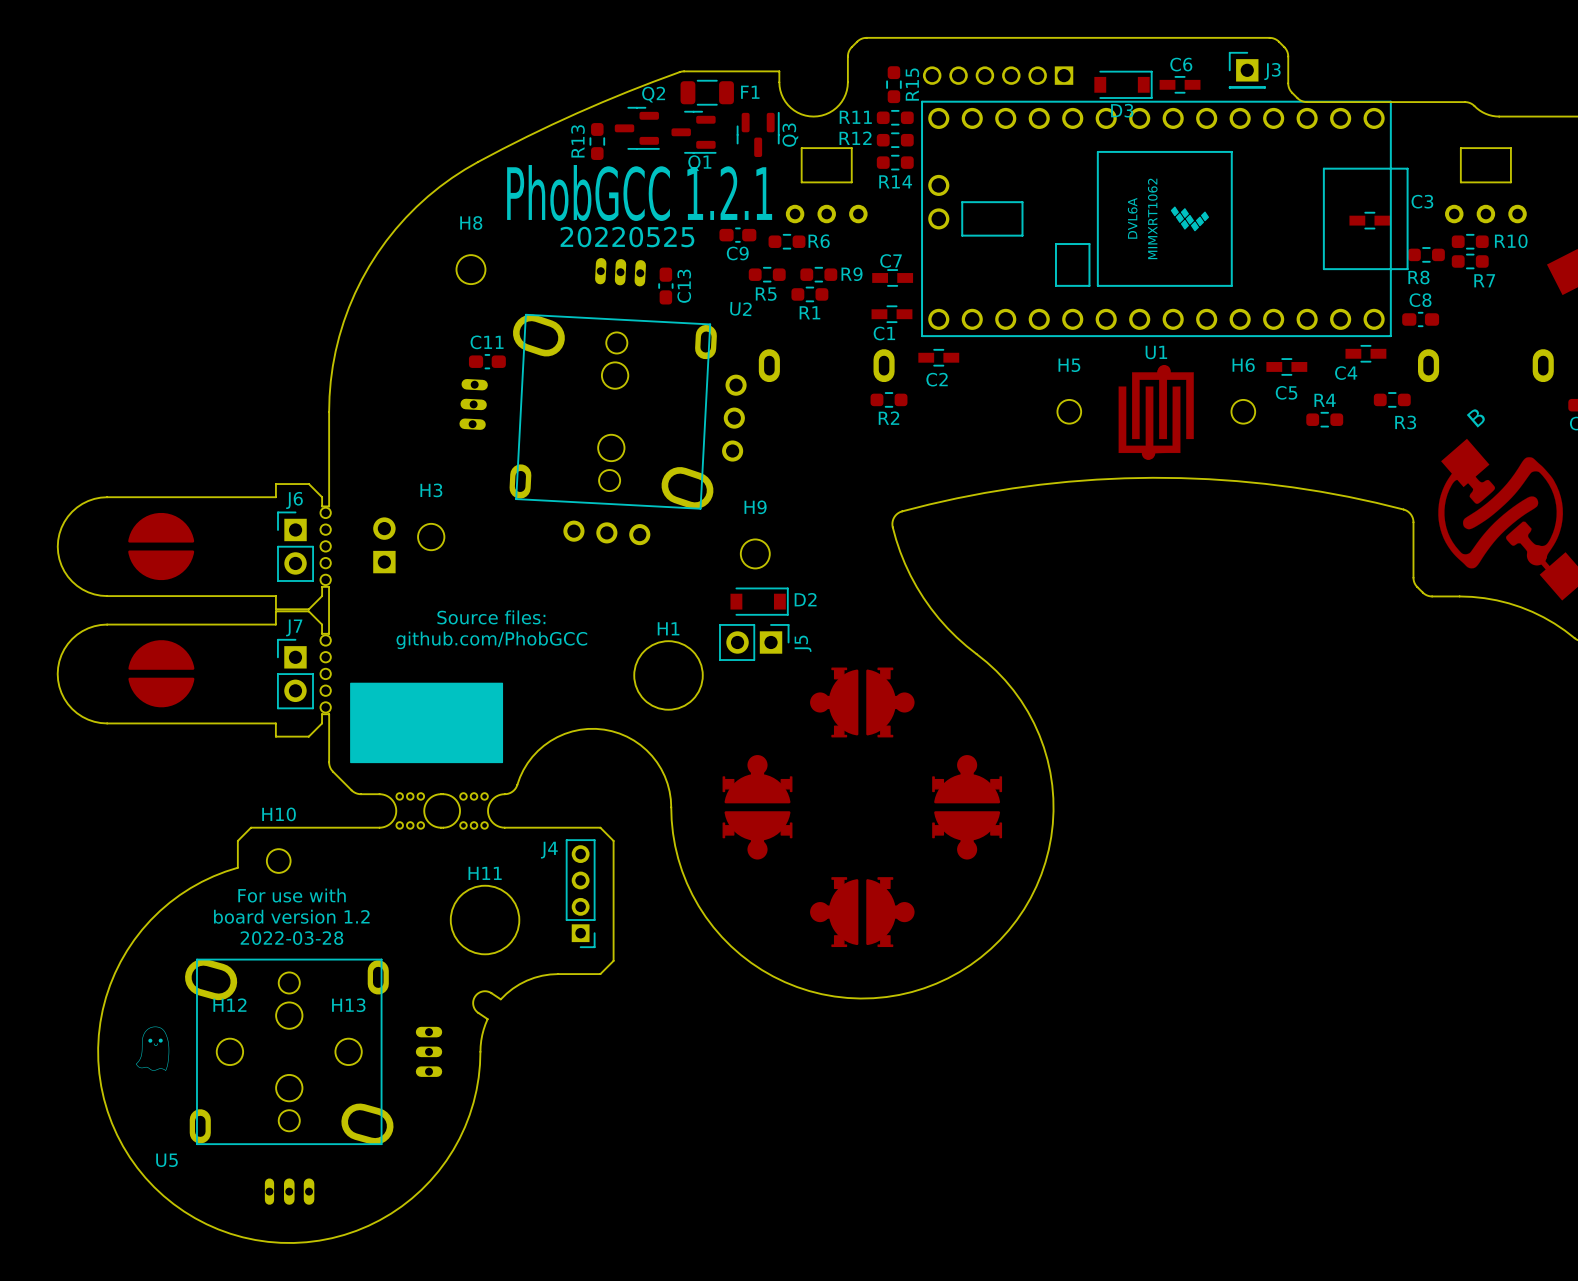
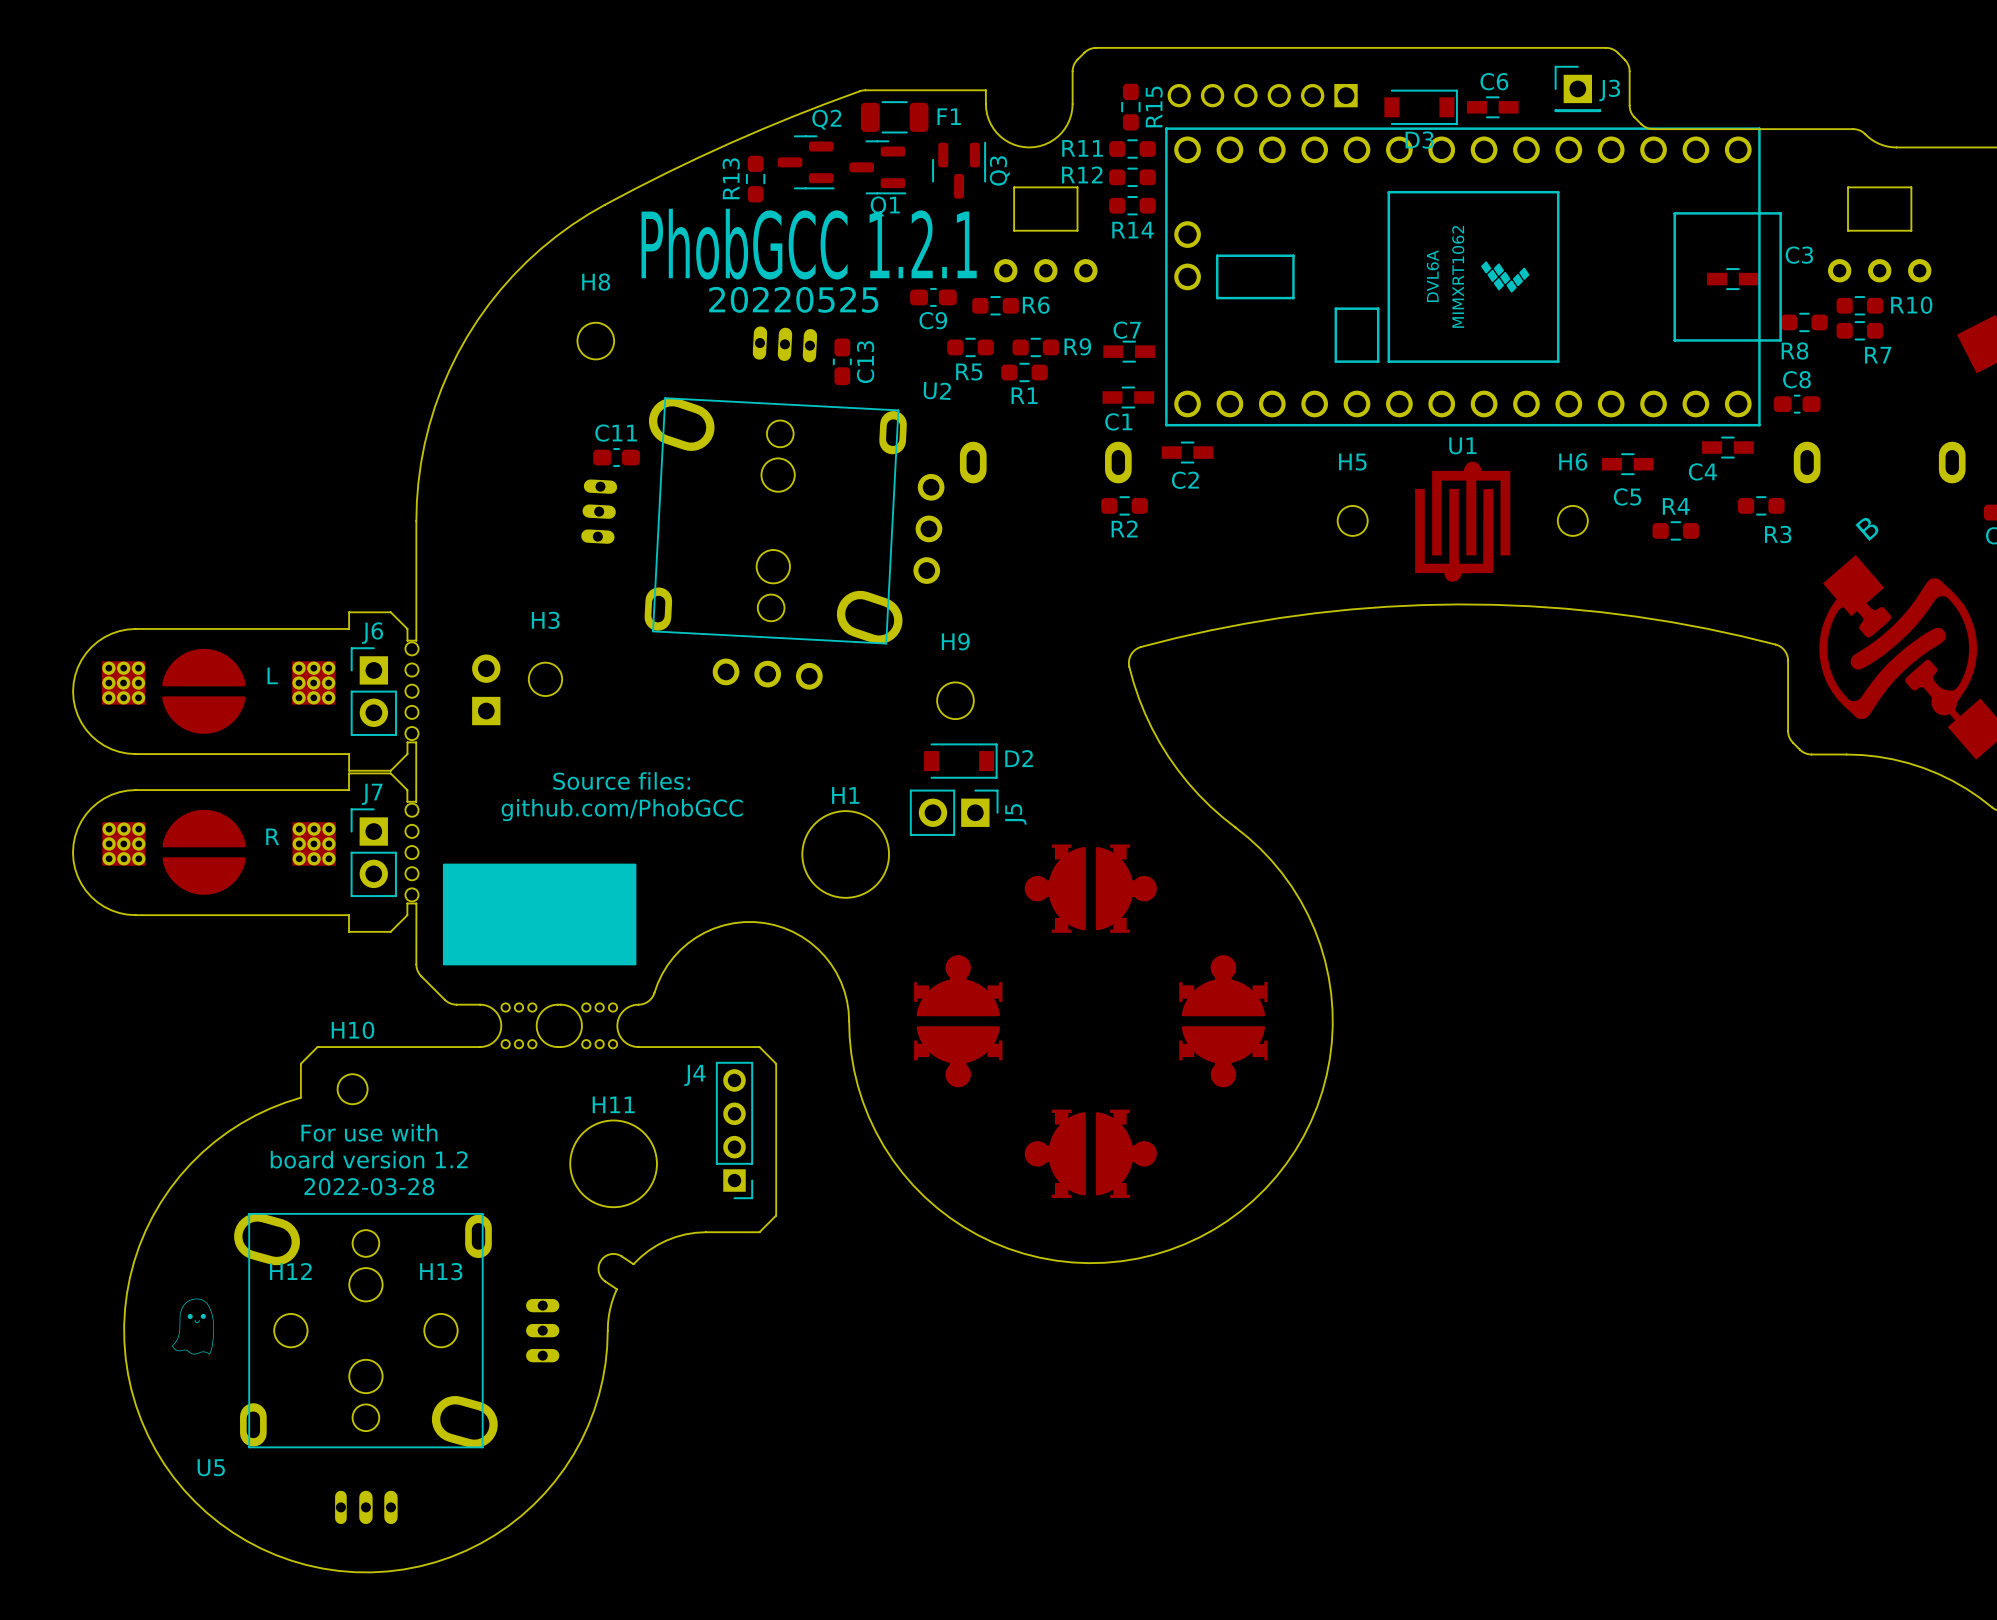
part footprint: [128, 512, 195, 581] -> [102, 648, 336, 734]
part value: none -> L (272, 675)
part footprint: [128, 640, 195, 708] -> [102, 809, 336, 895]
part value: none -> R (272, 836)

